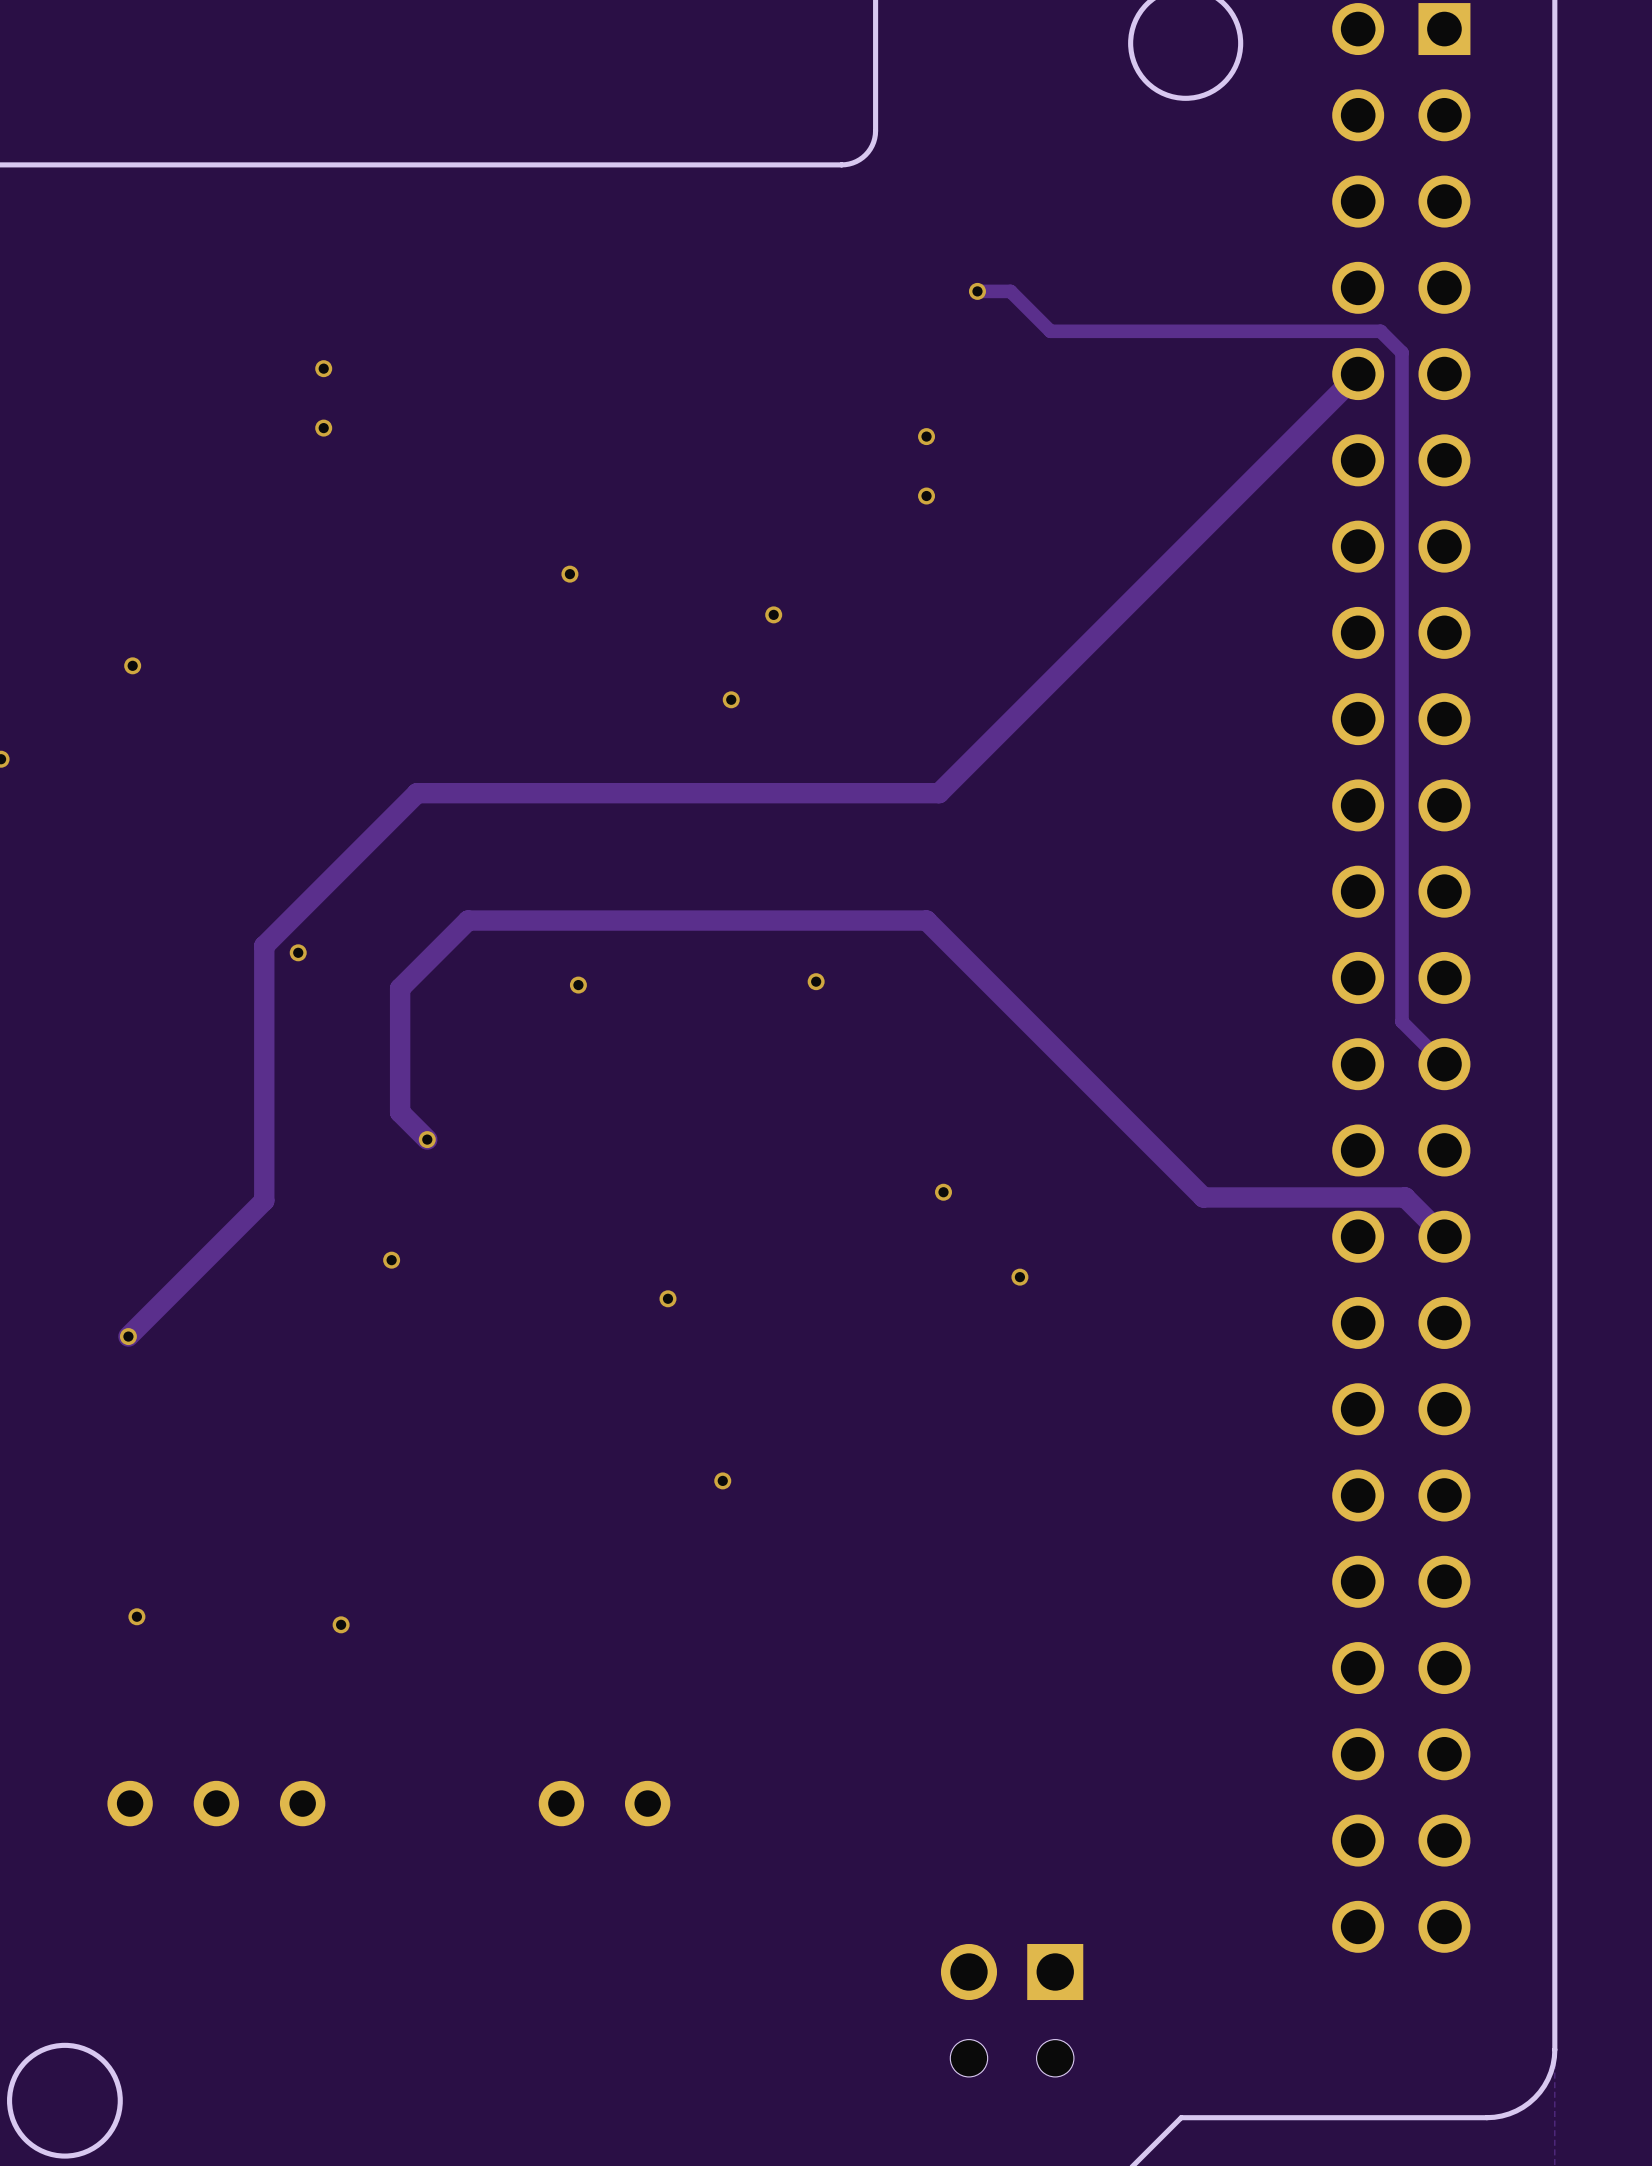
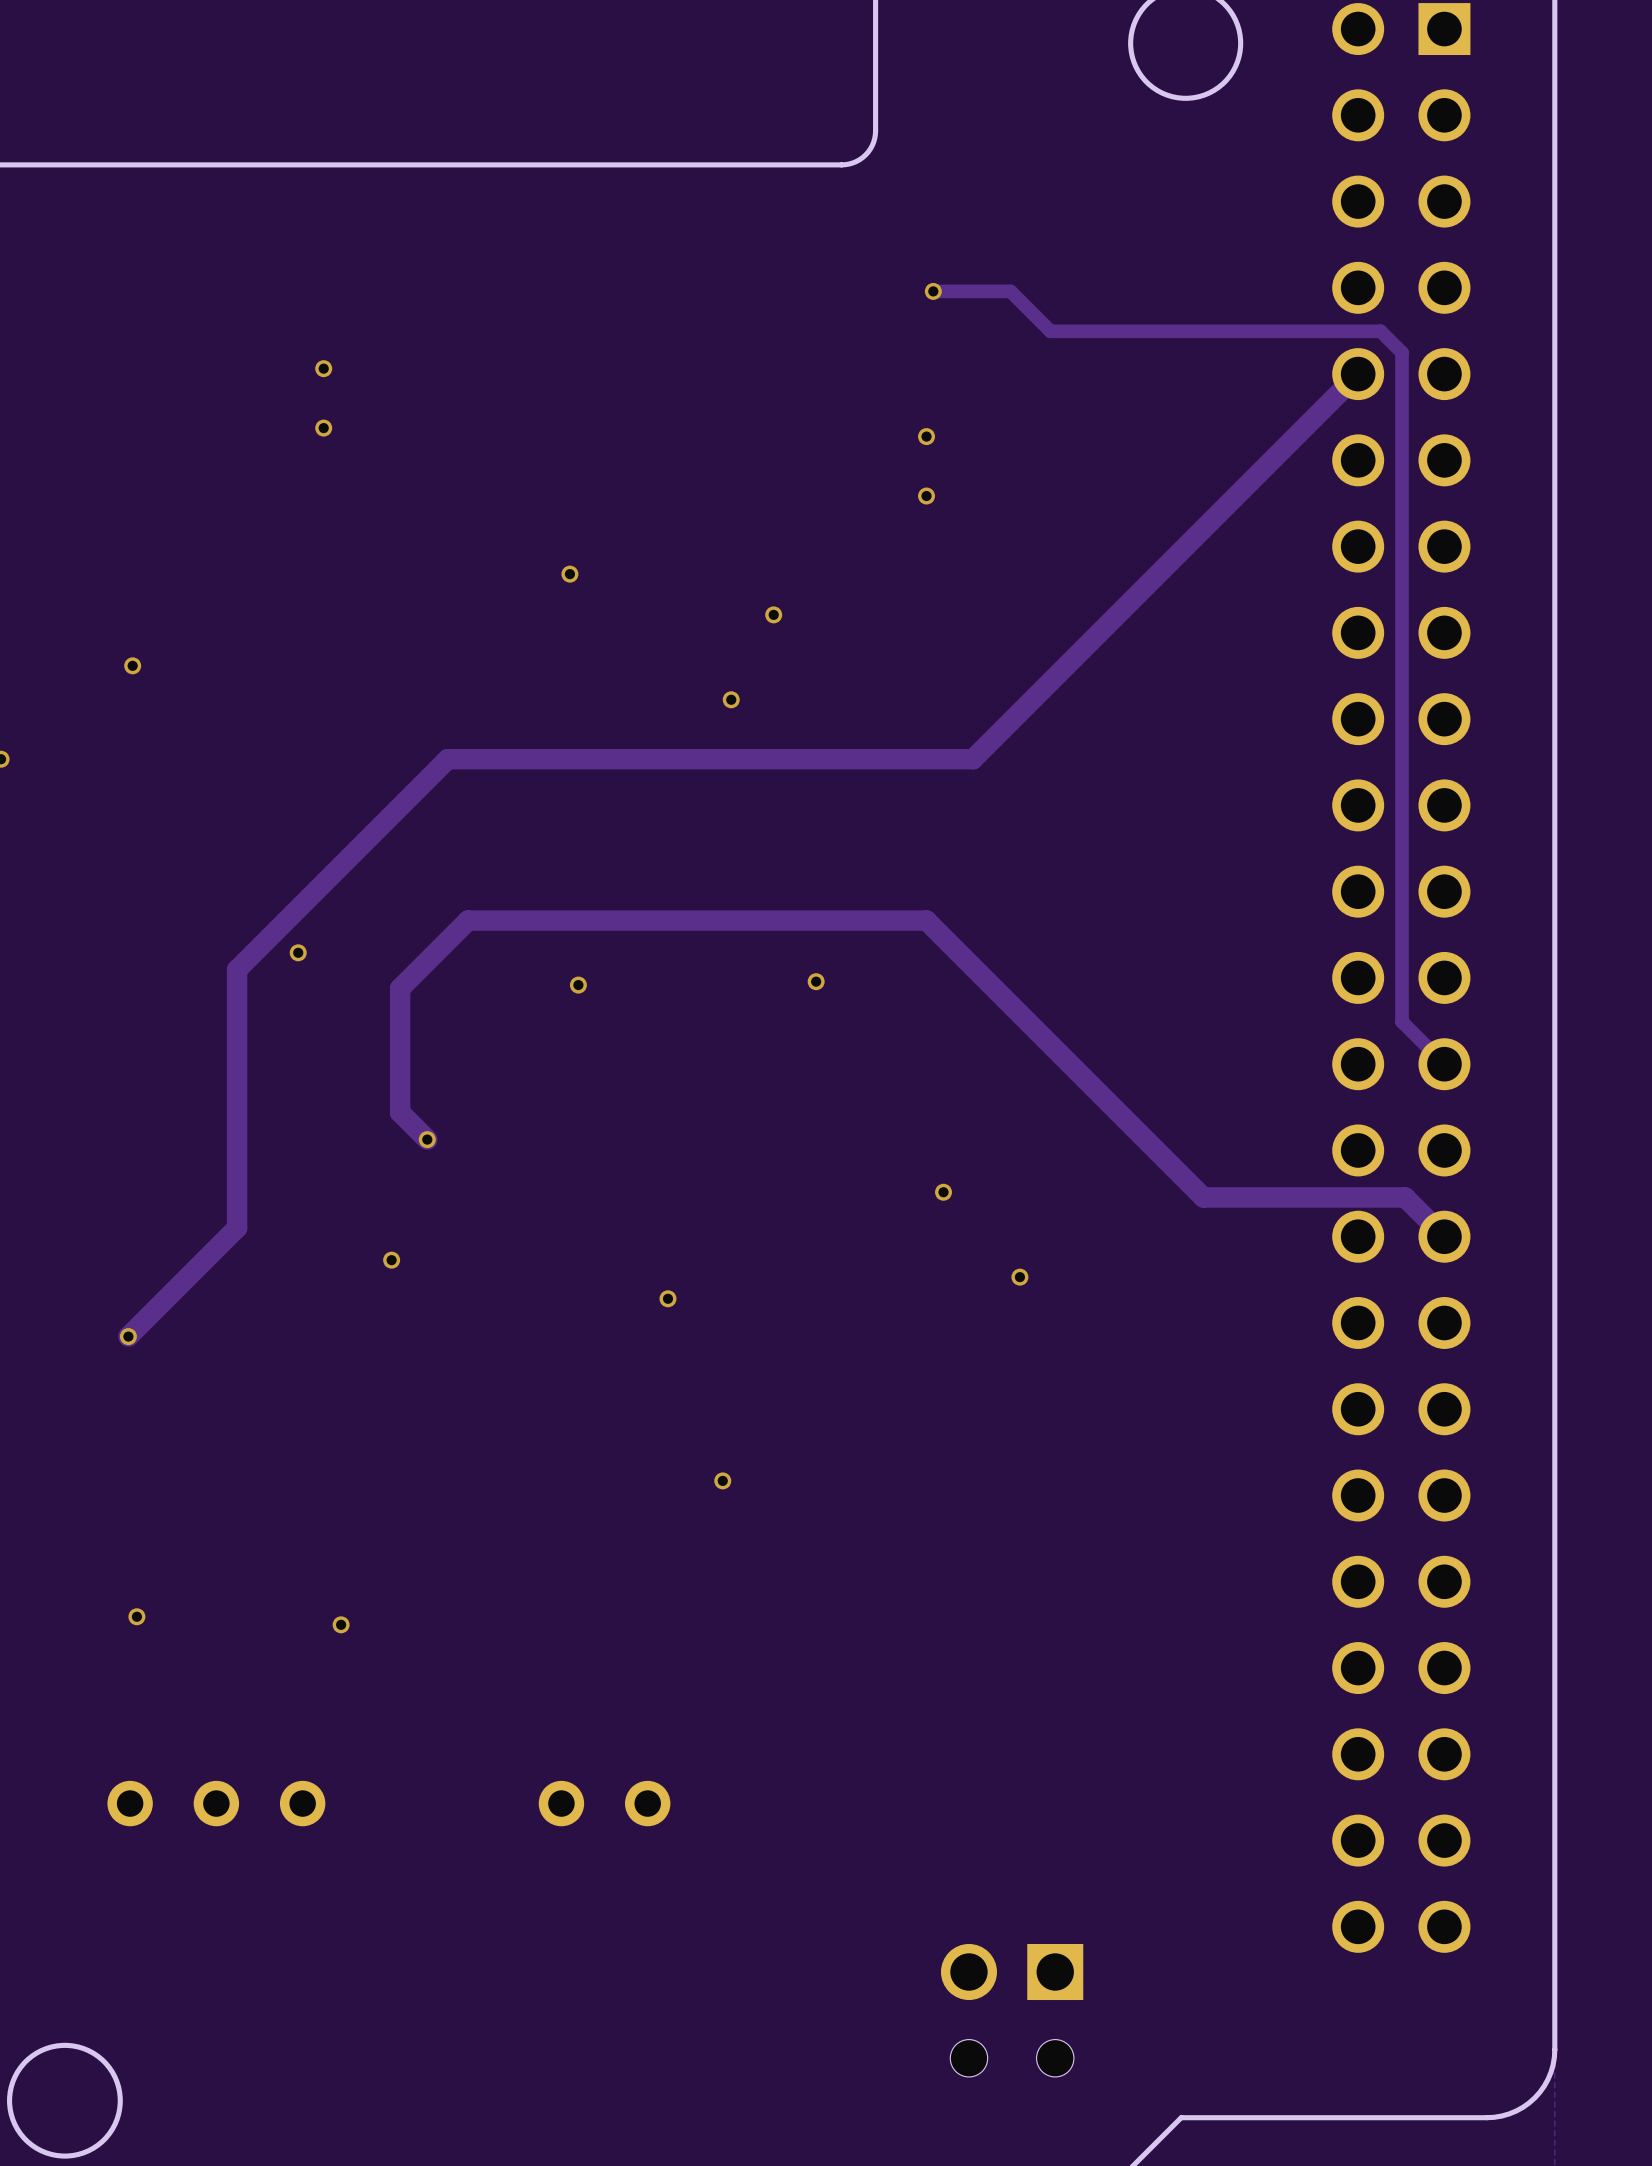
track: none -> (977, 291) (933, 291)
via position: (977, 291) -> (933, 291)
track: (973, 759) (939, 793) (417, 793) (264, 946) (264, 1200) (237, 1227) -> (973, 759) (447, 759) (237, 969) (237, 1227)

